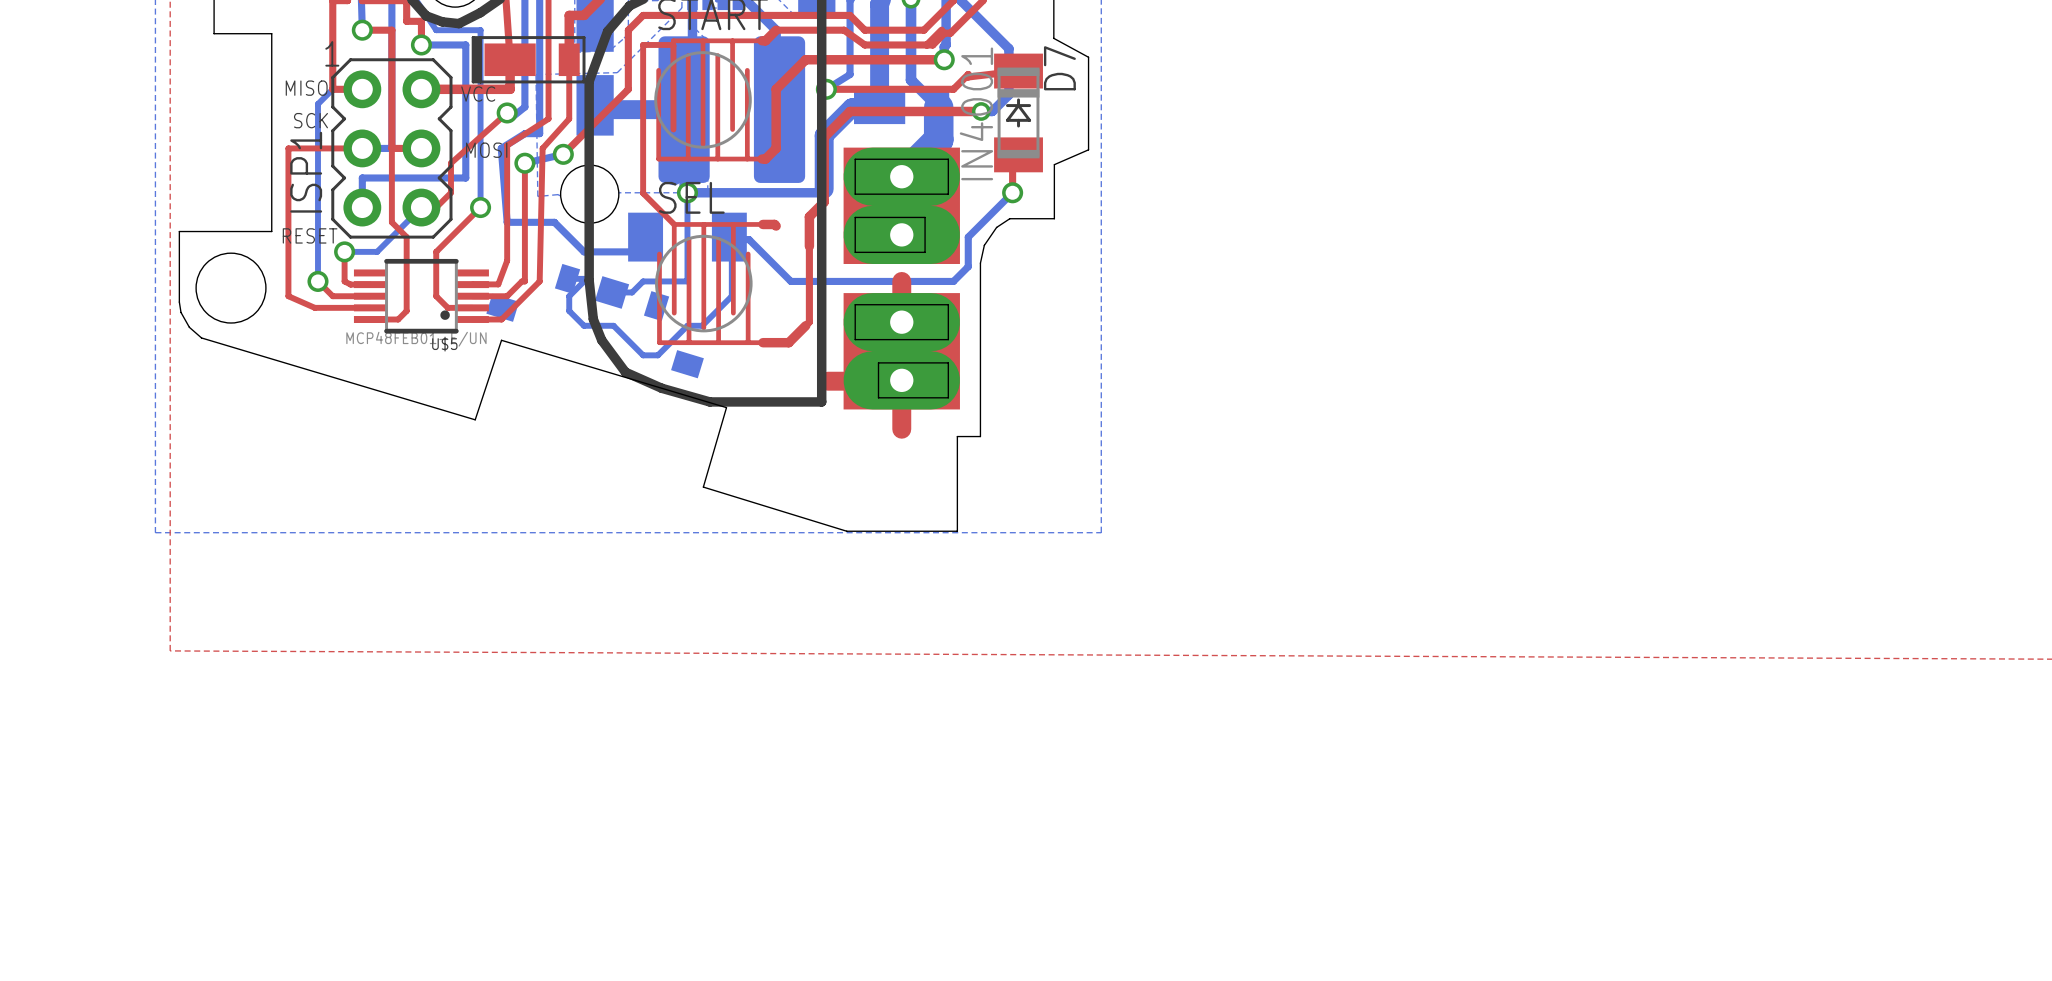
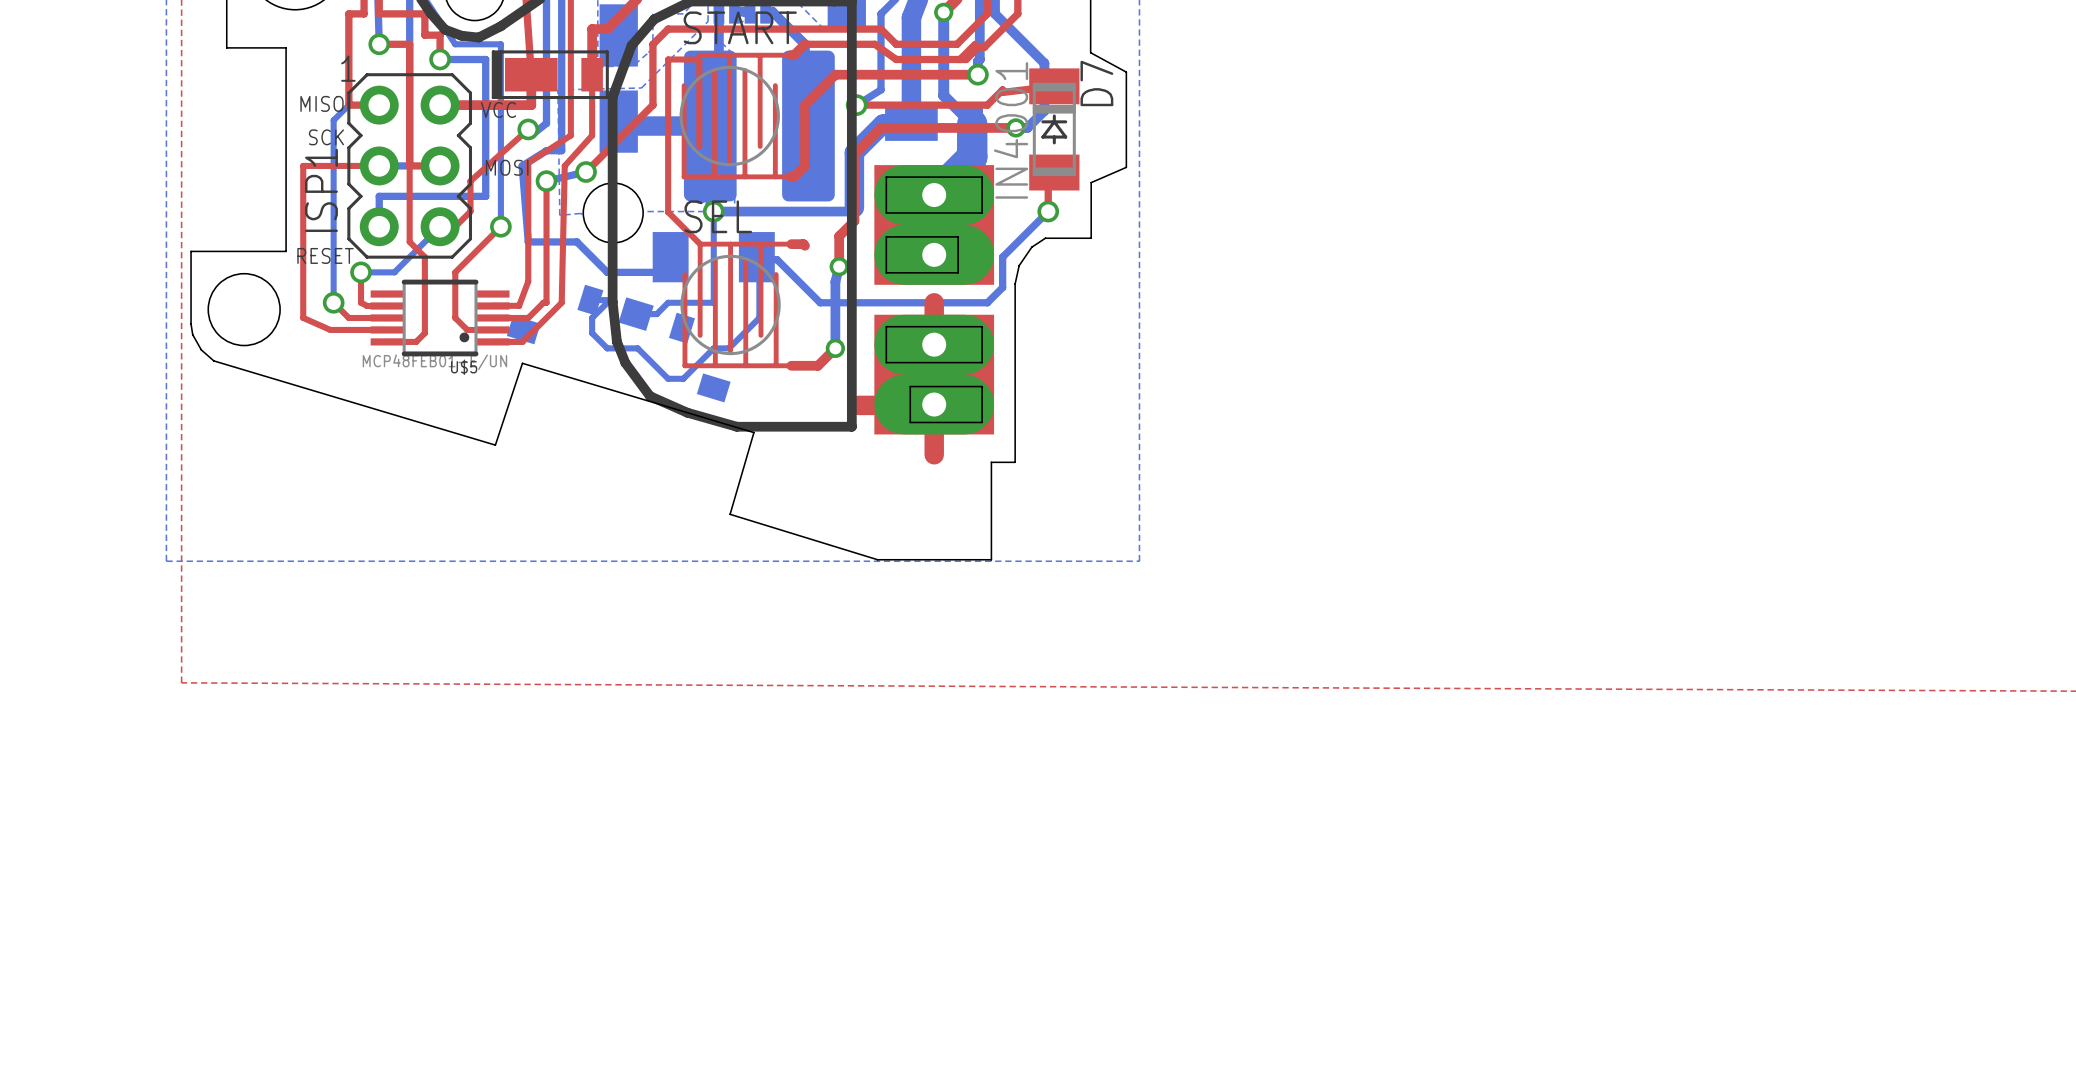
top track: (809, 246) (809, 322) (805, 325) -> none
bottom track: none -> (839, 266) (835, 281) (835, 348)
via: none -> (839, 266)
via: none -> (835, 348)

